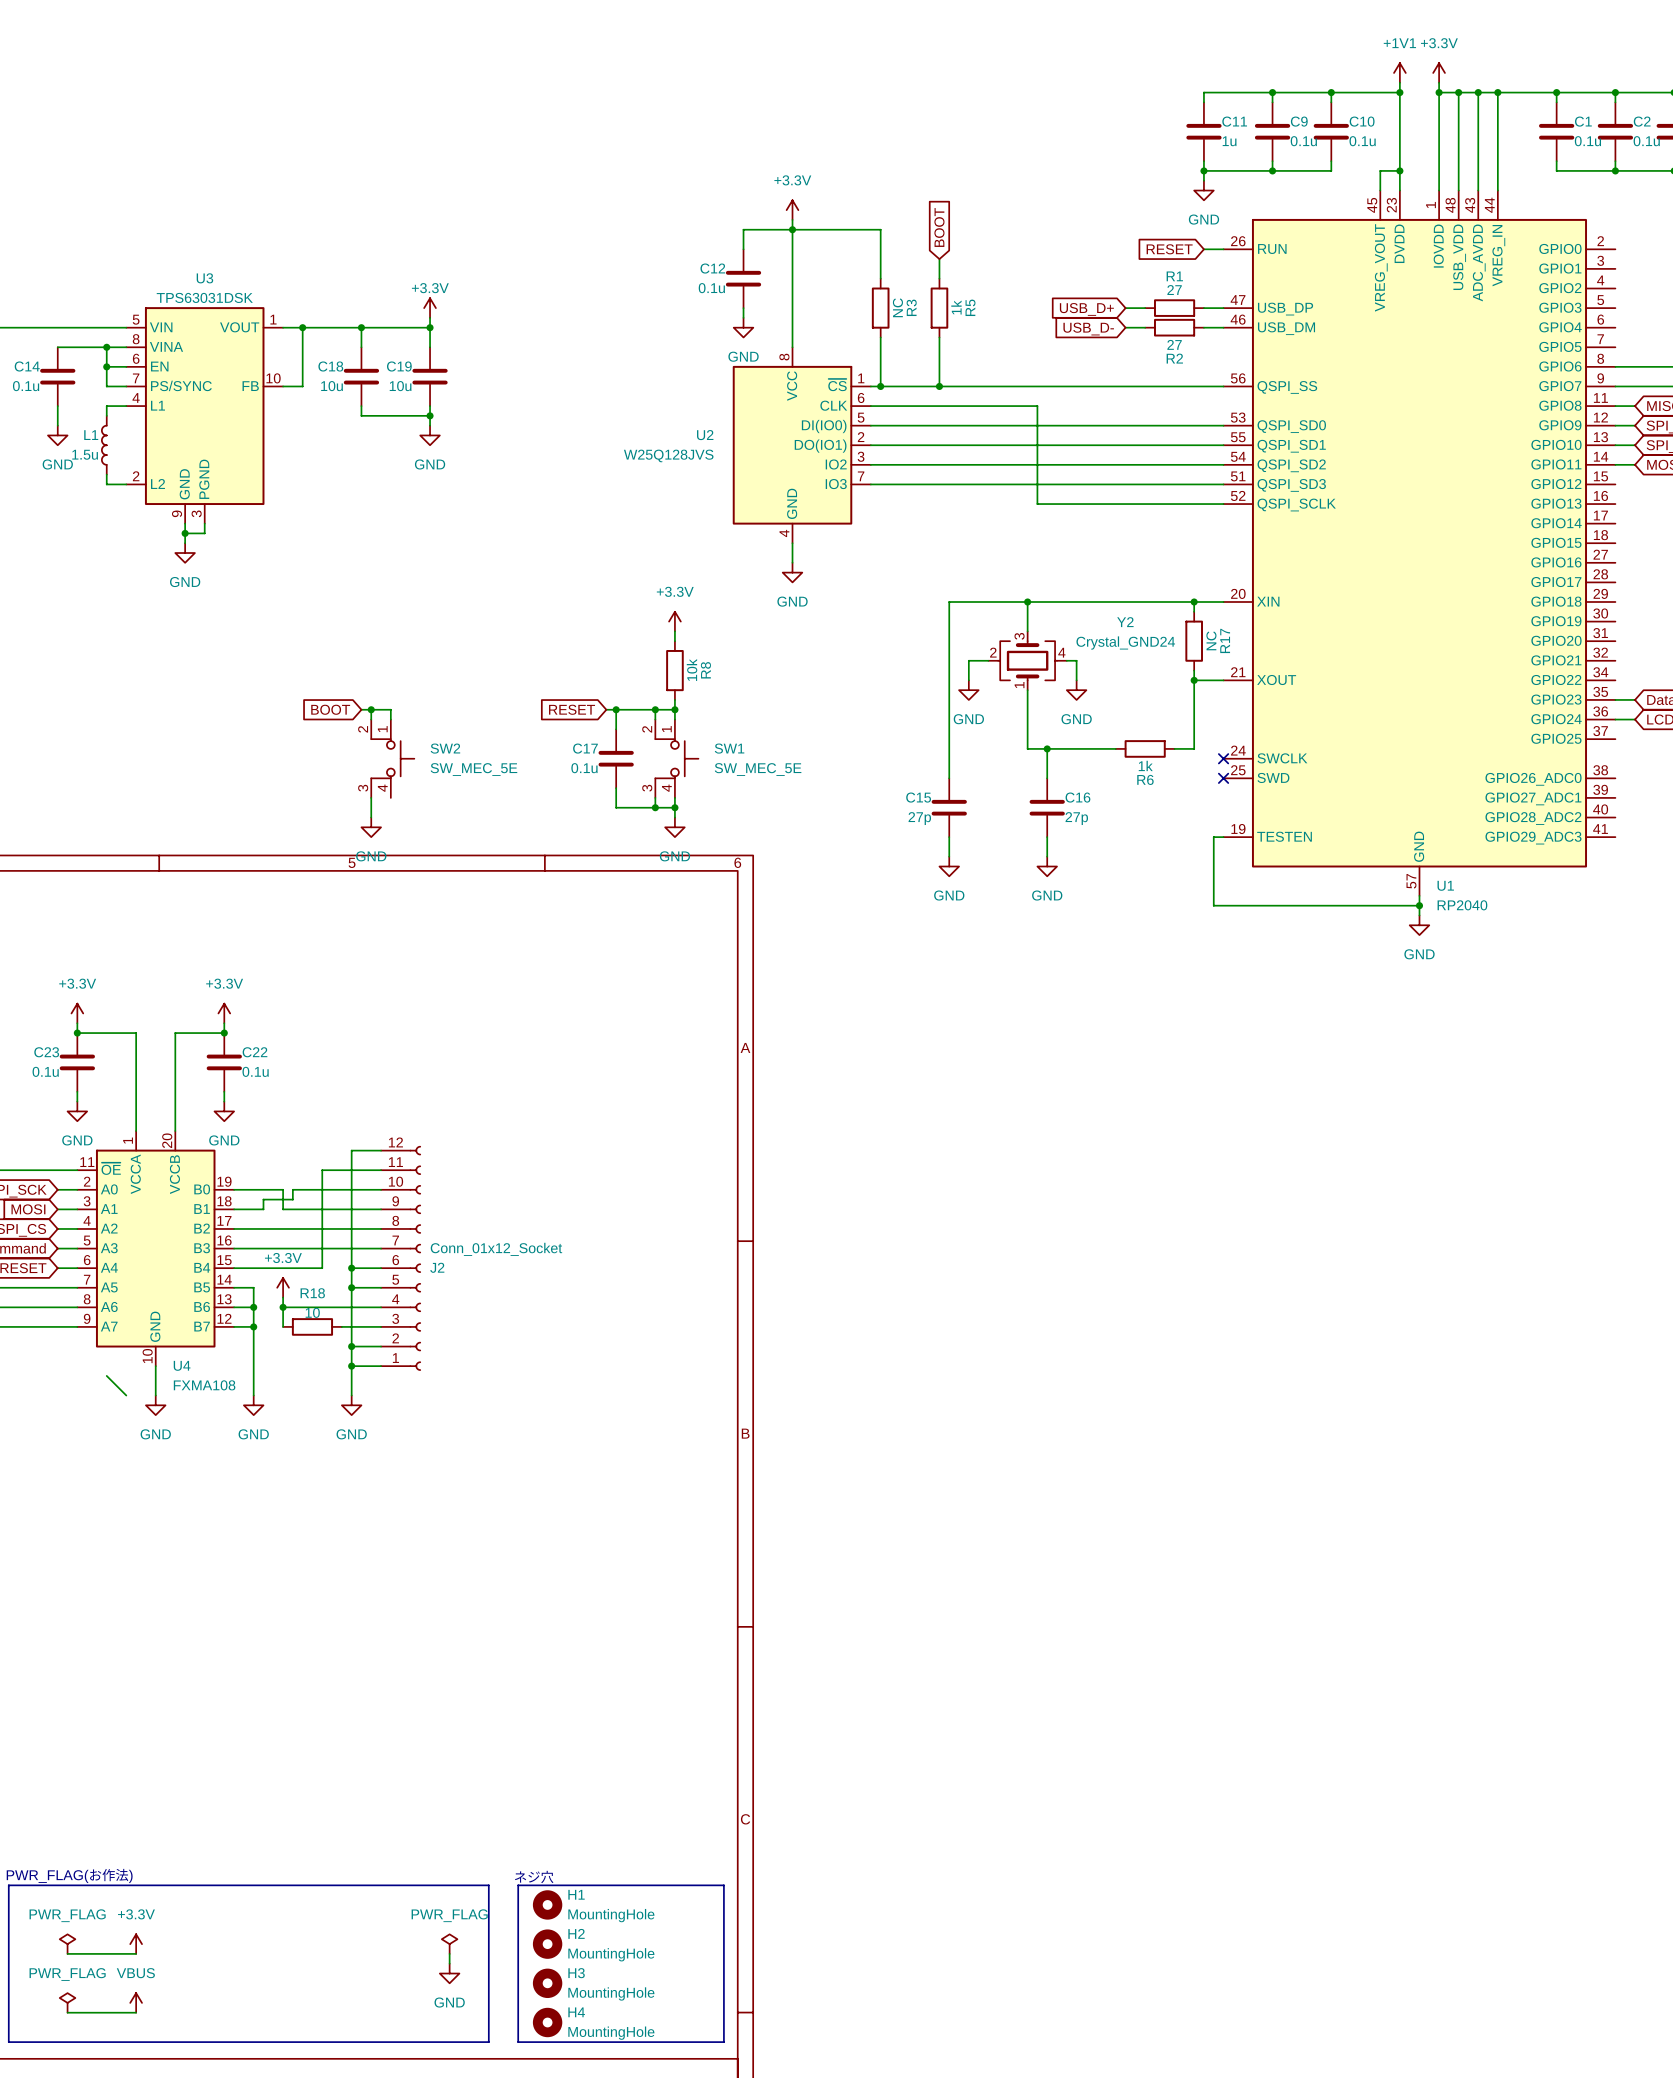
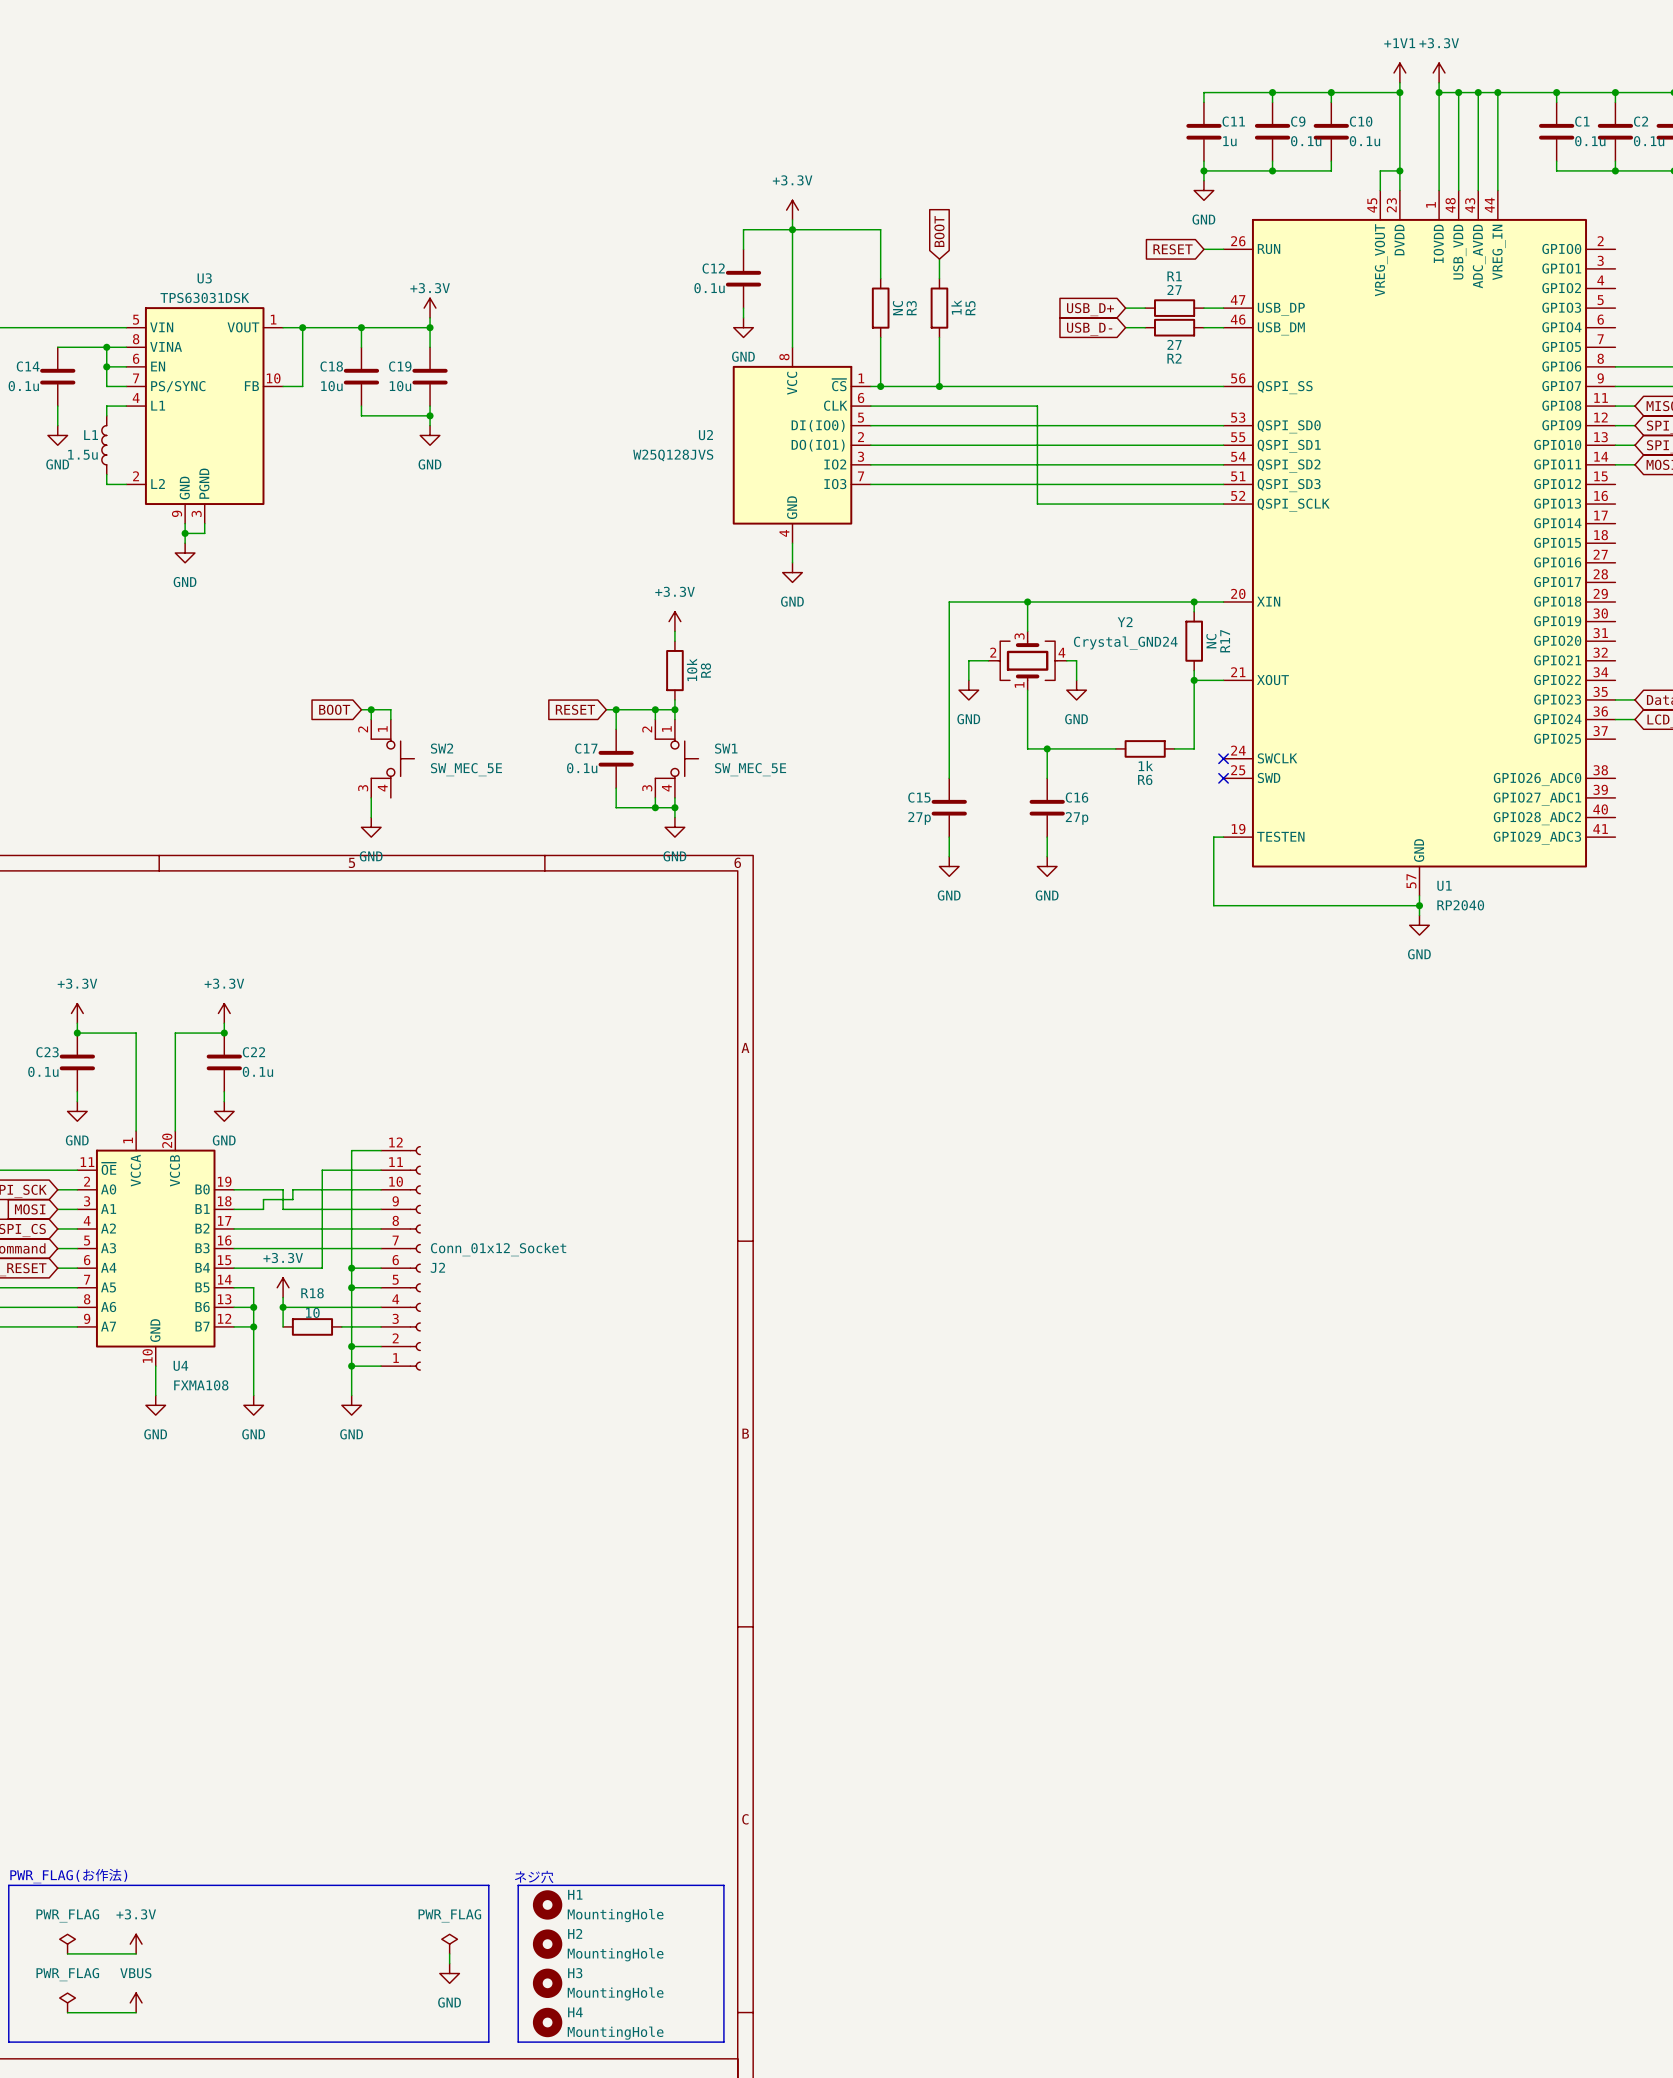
wire: (106, 1375) (126, 1395) -> none

